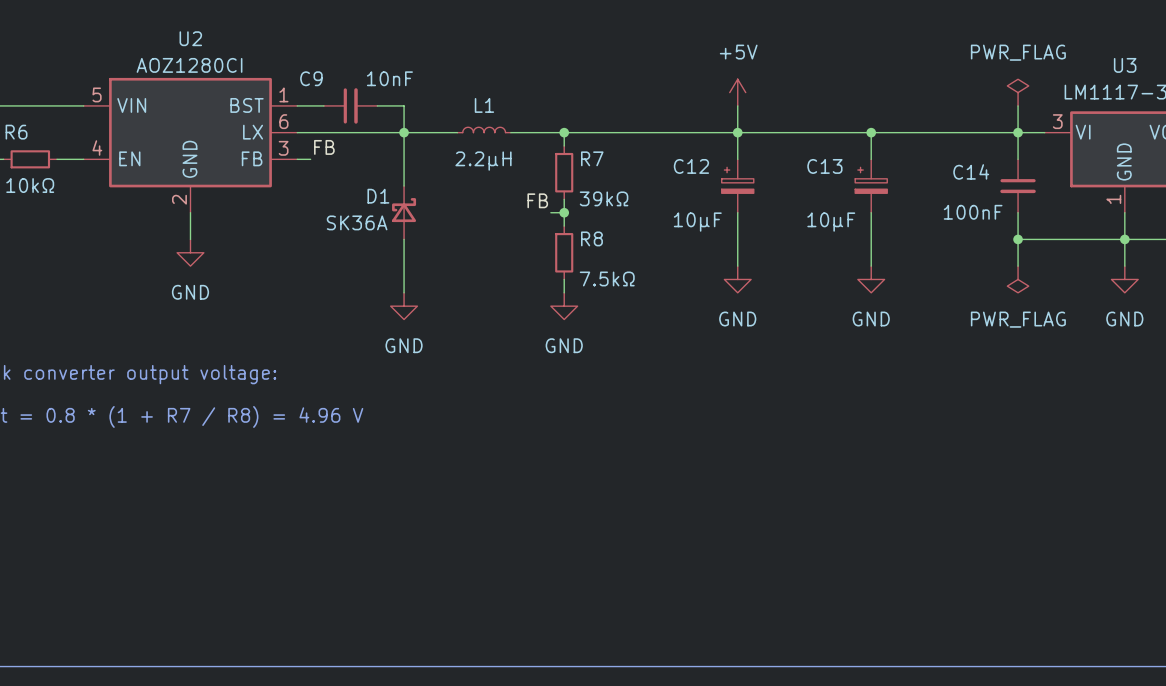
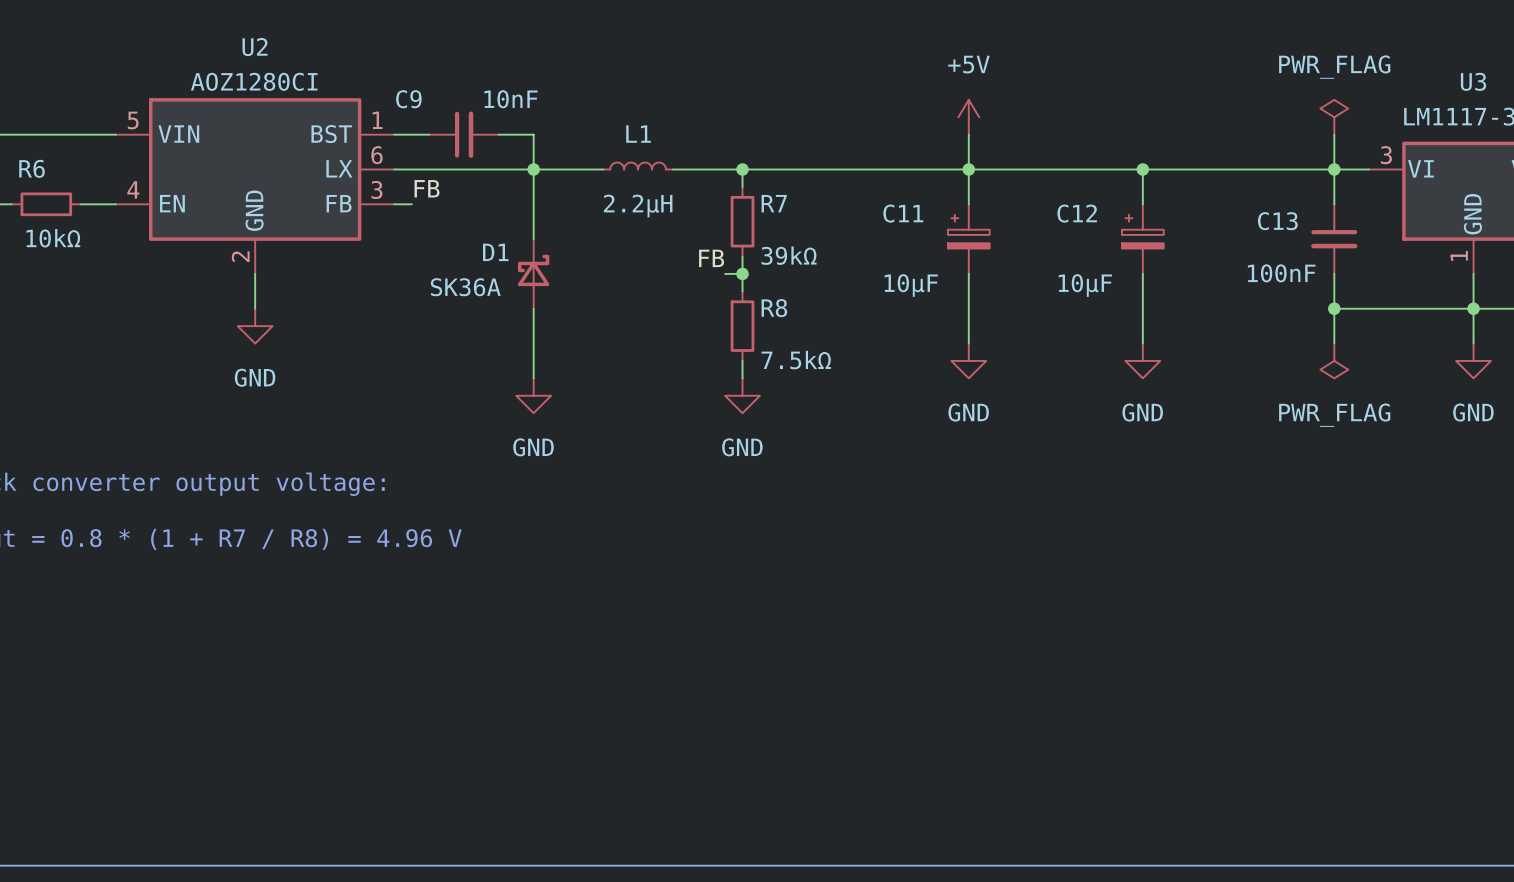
C12 name: C12 (691, 166) -> C11 (903, 213)
C13 name: C13 (824, 166) -> C12 (1077, 213)
C14 name: C14 (971, 171) -> C13 (1277, 221)

